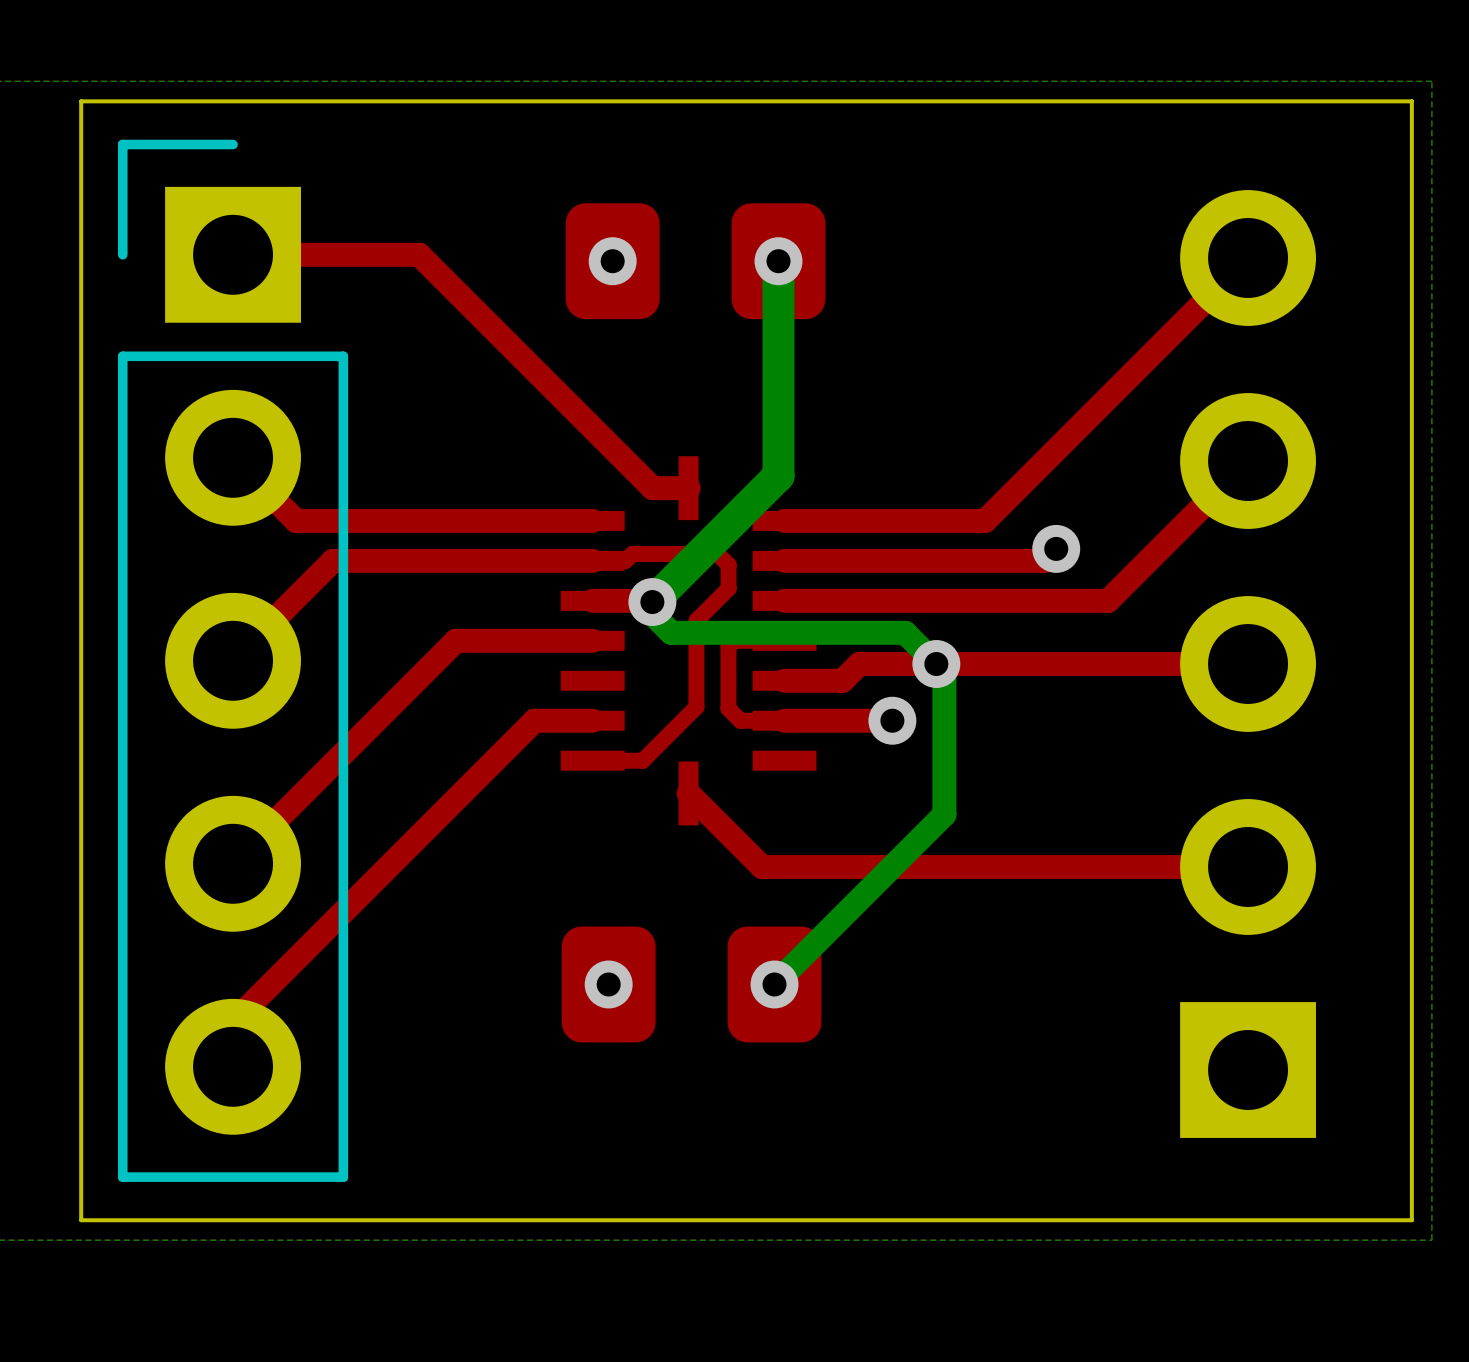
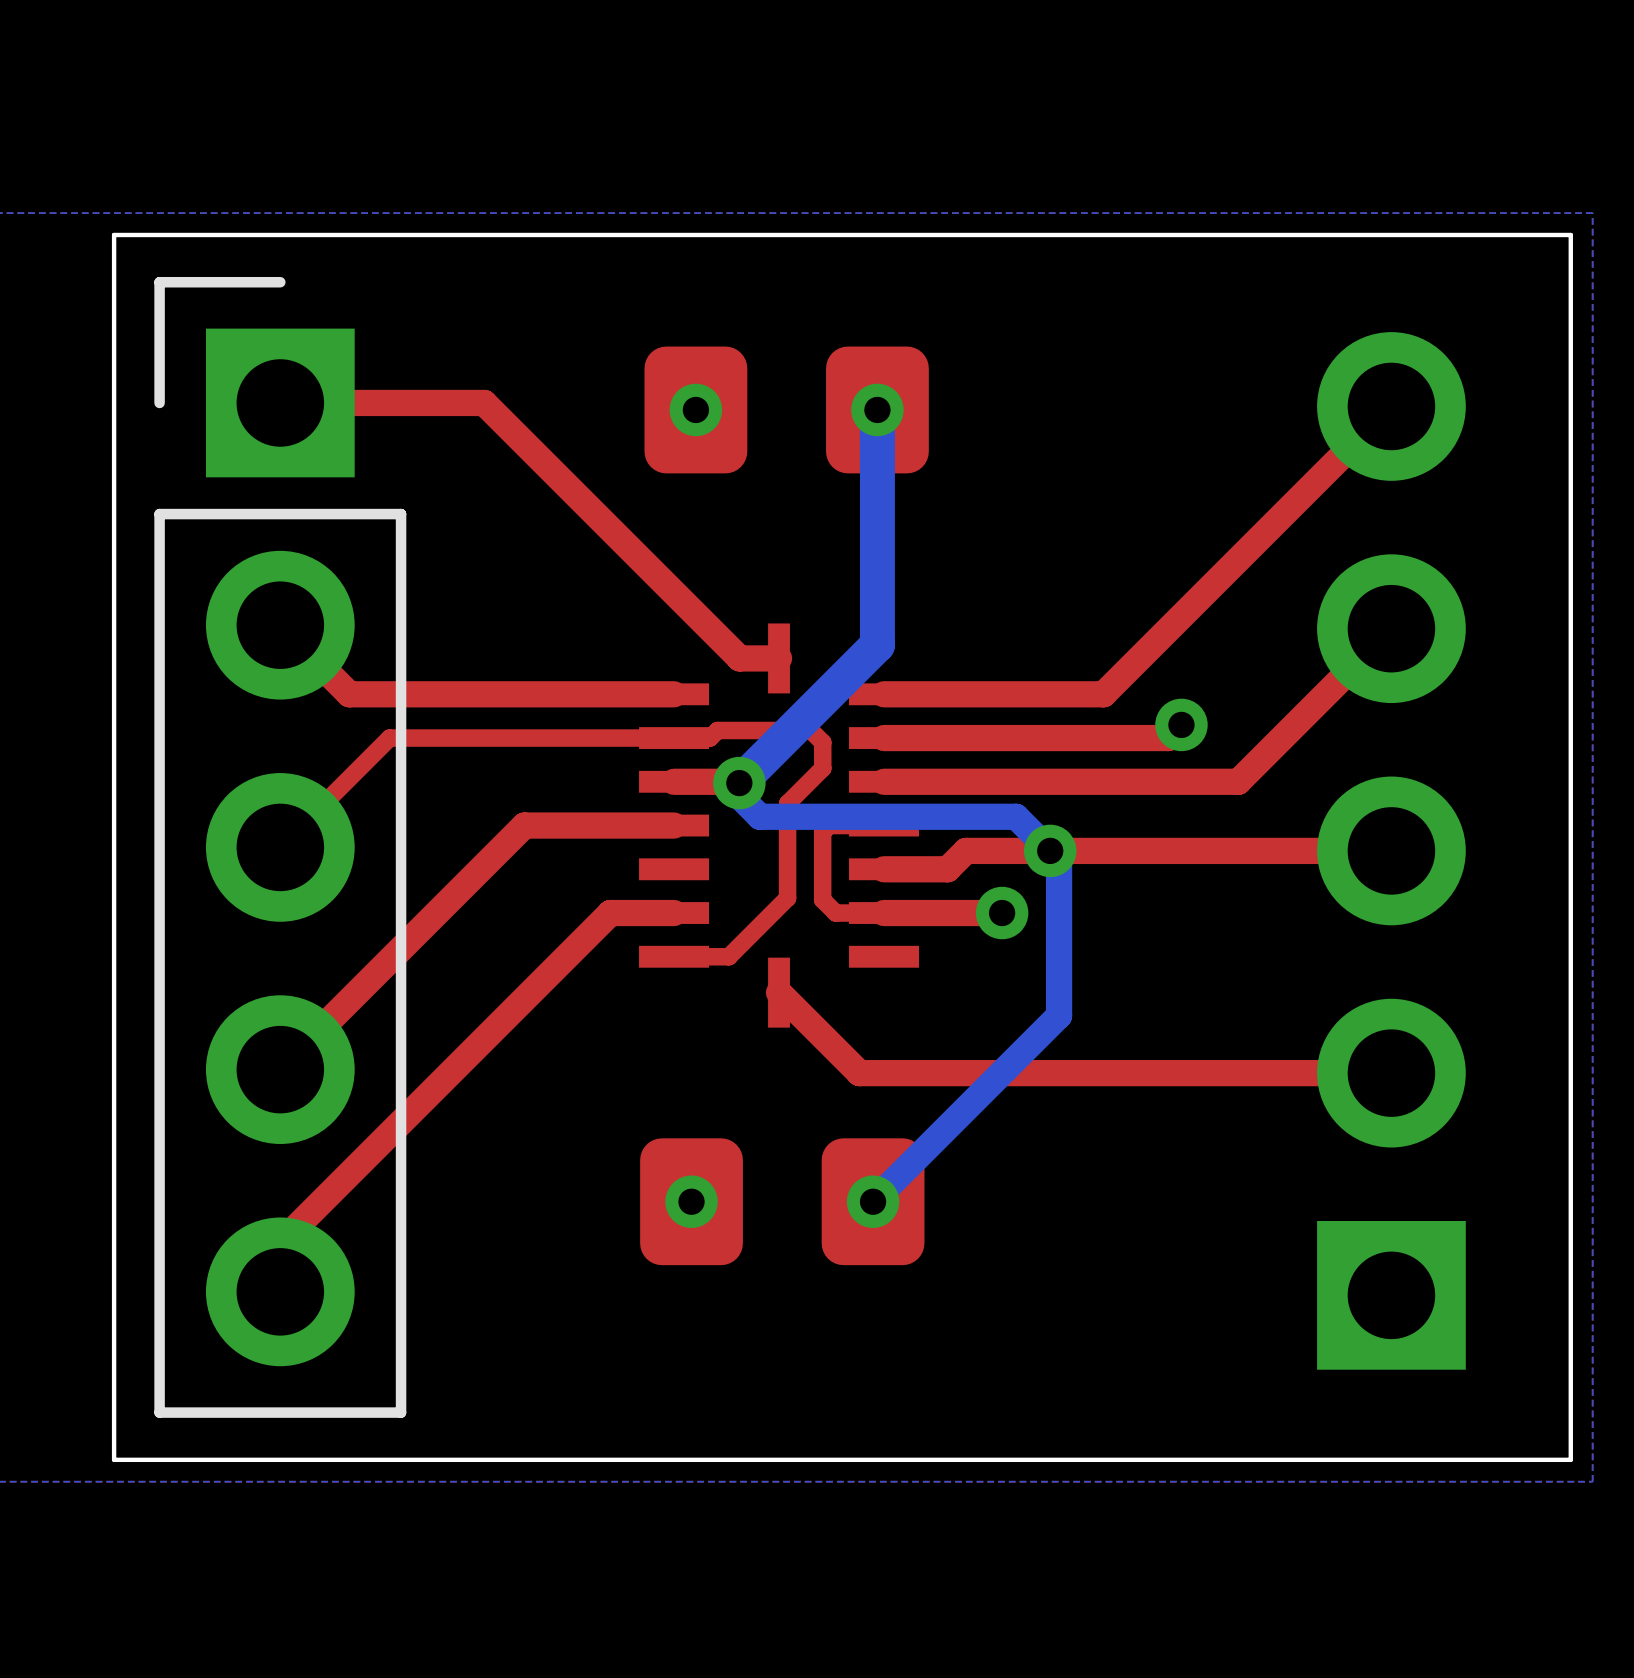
top track width: thick (592, 560) (332, 560) (233, 660) -> thin (674, 738) (389, 738) (280, 847)

